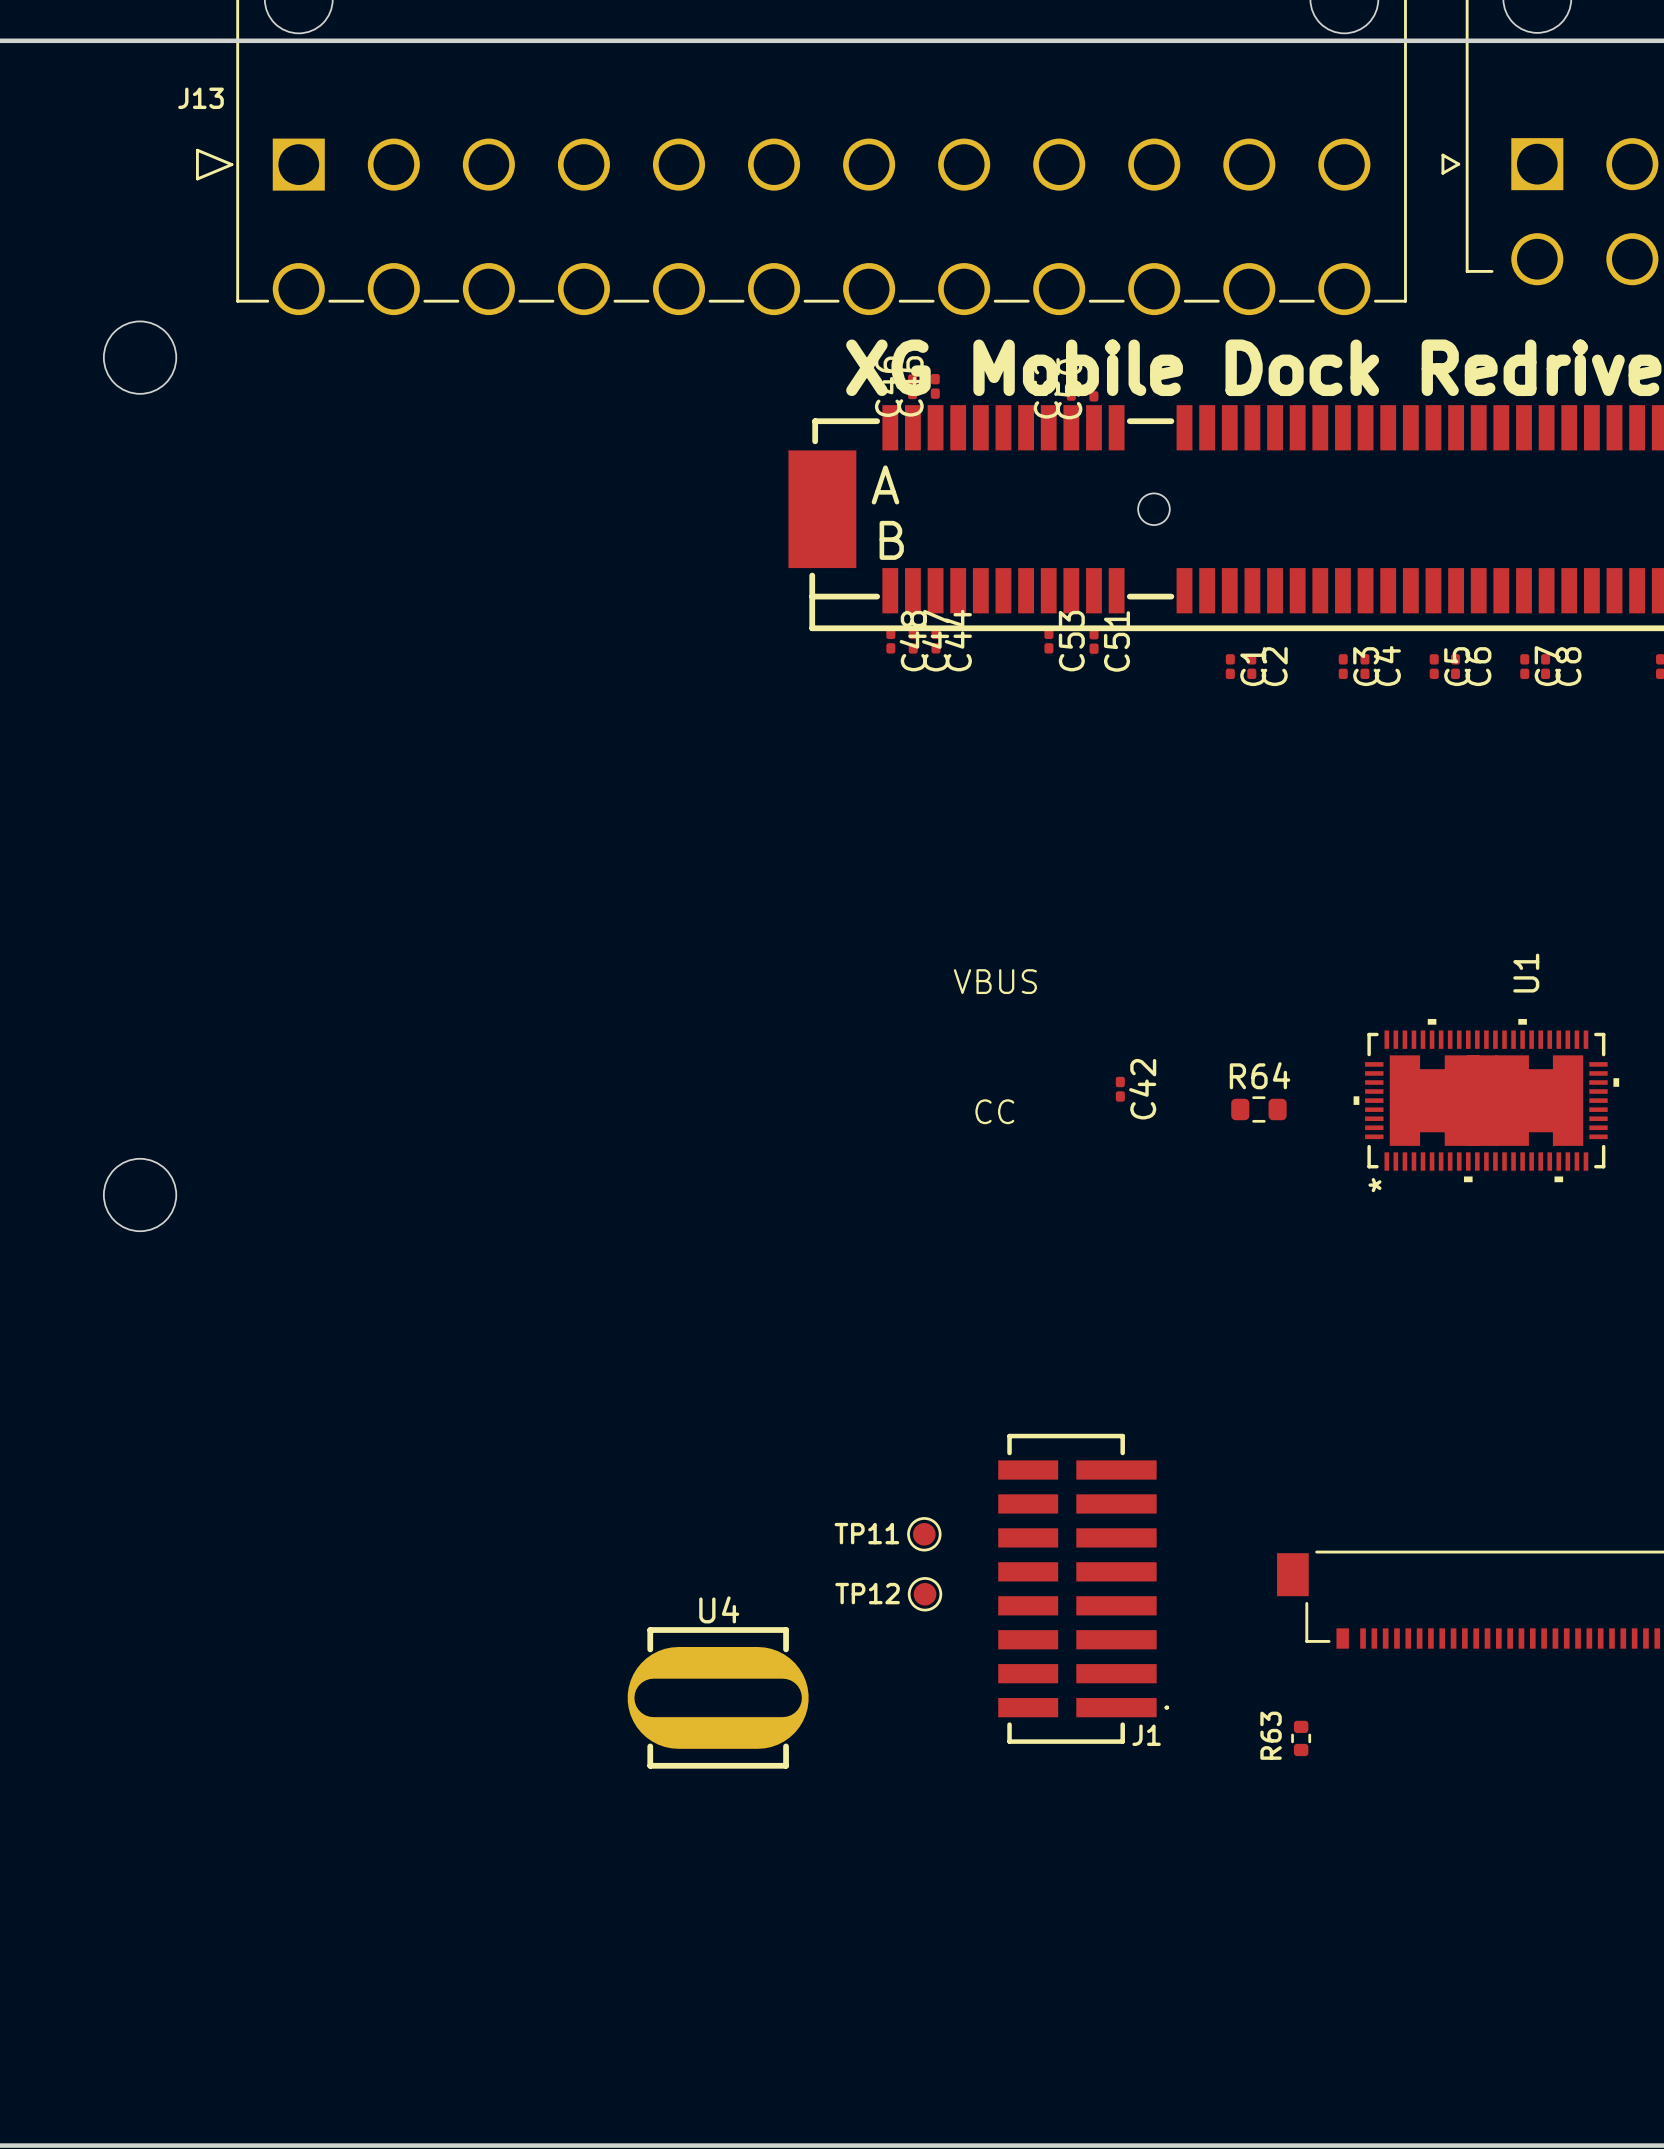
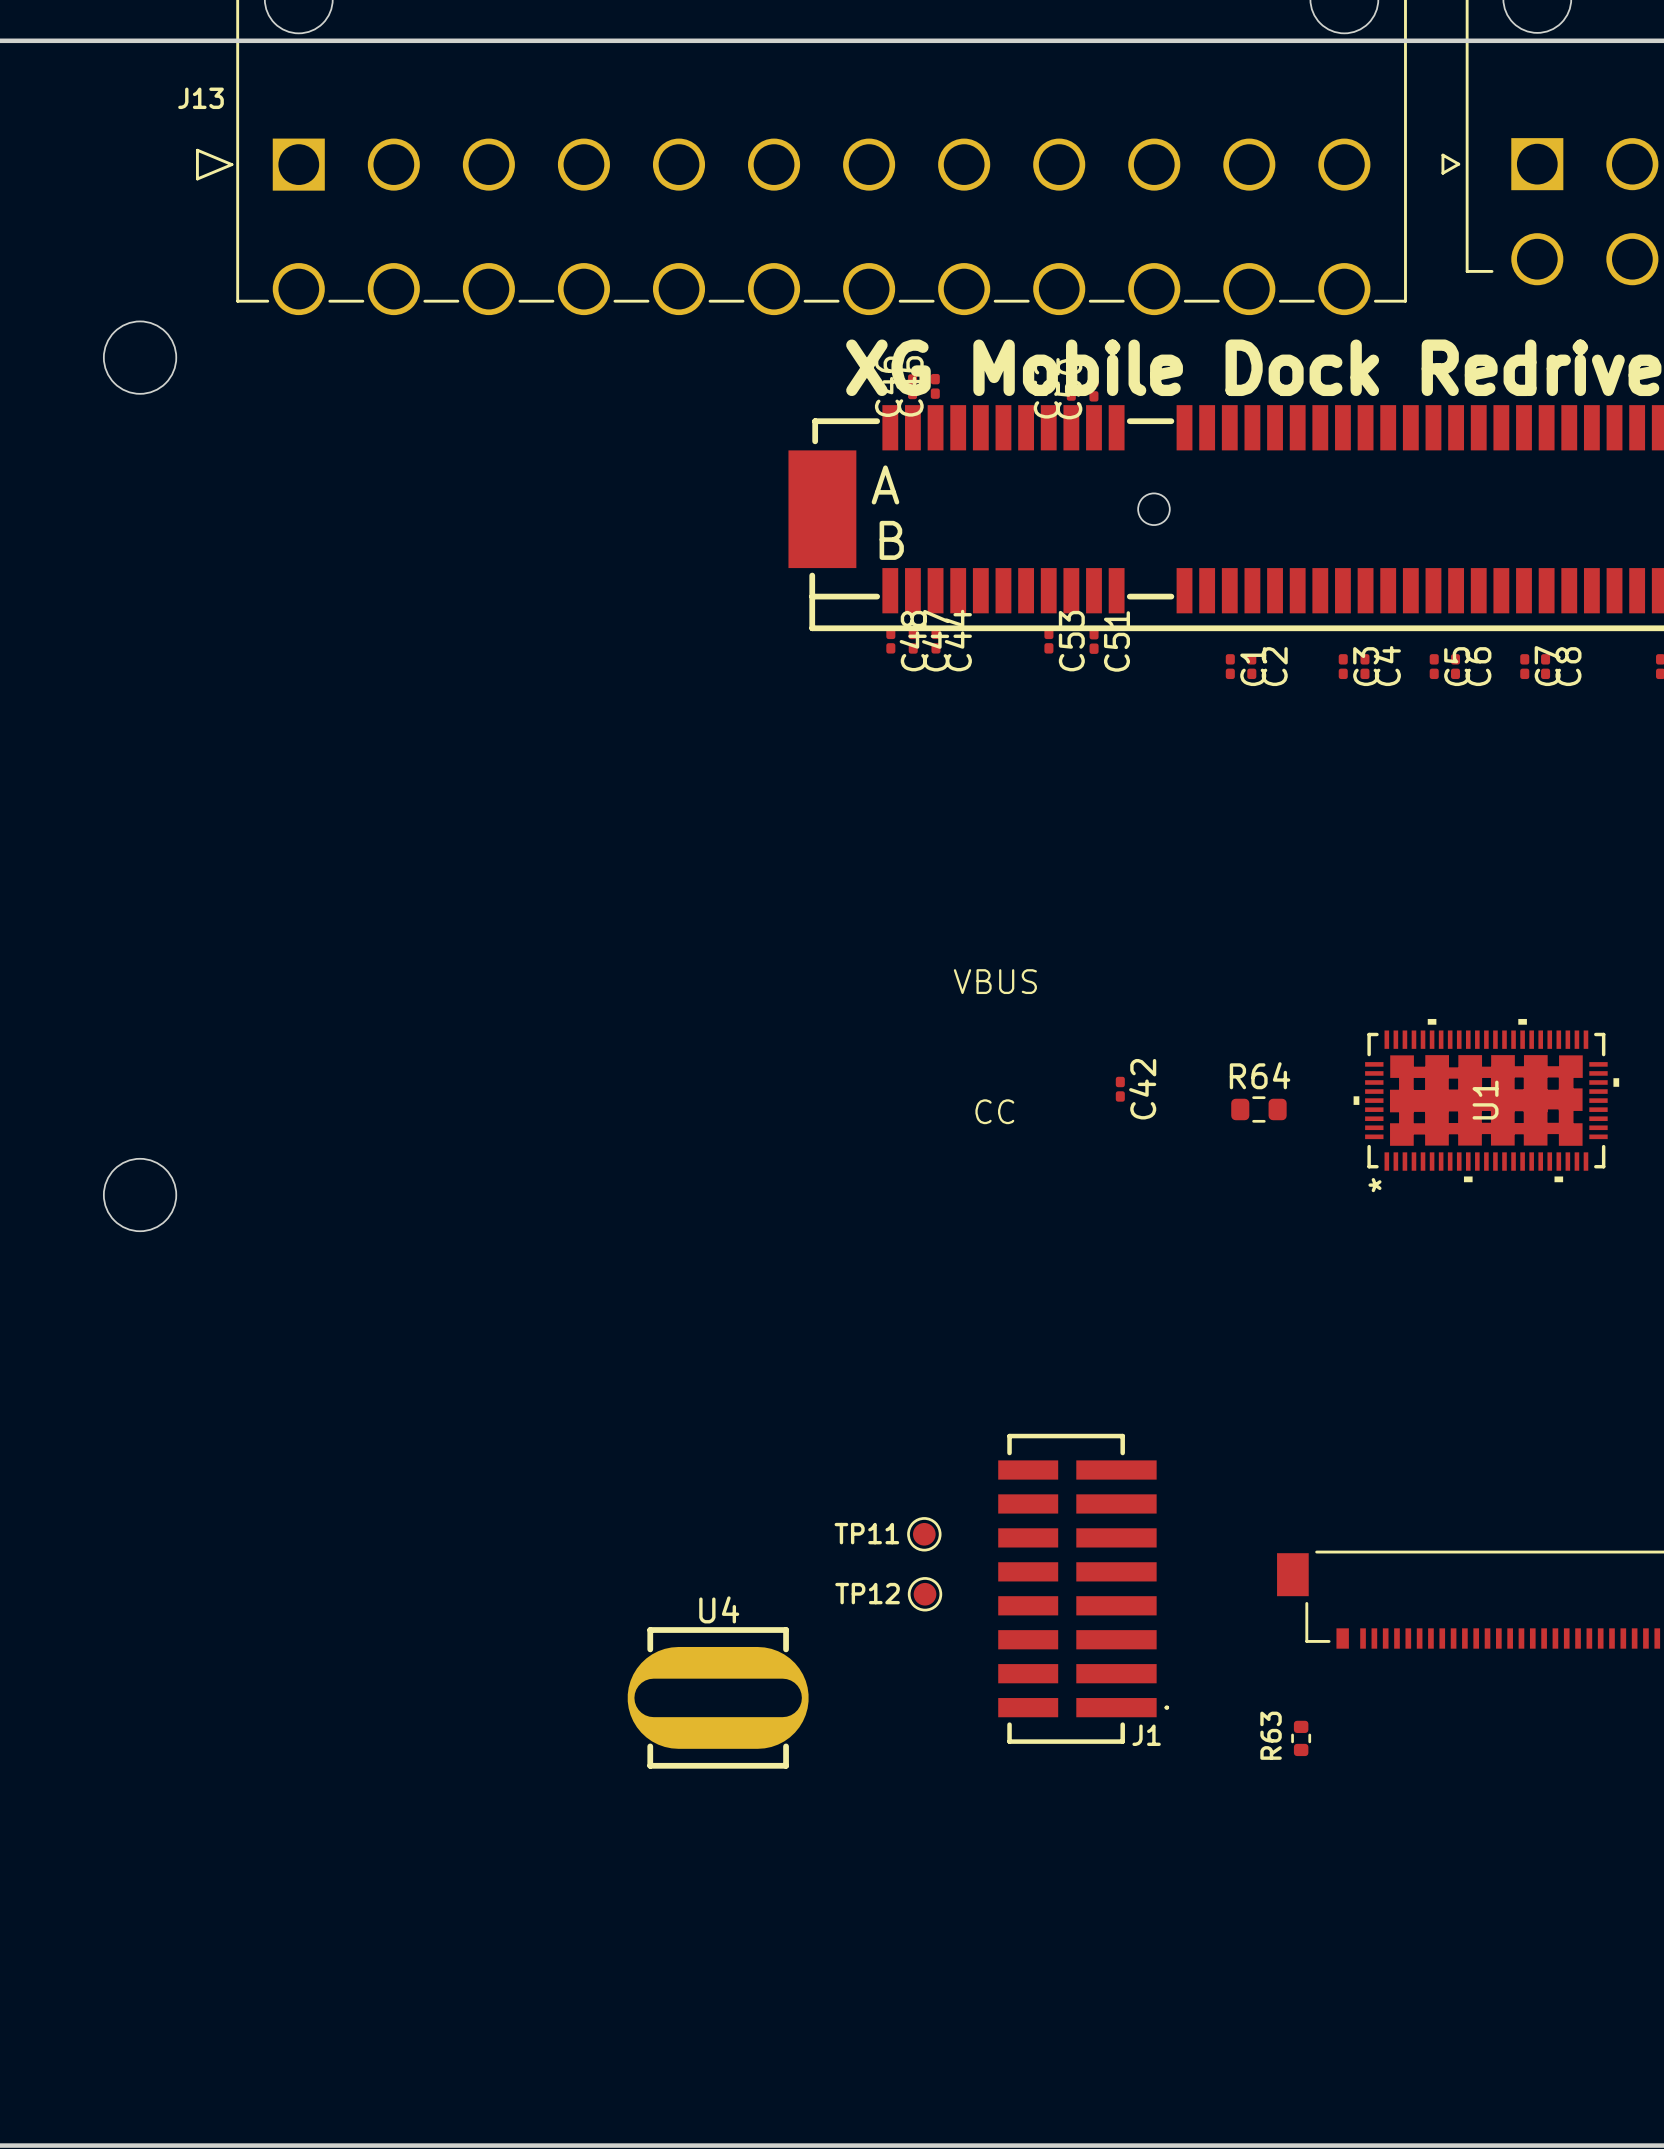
U1 name position: U1 (1526, 973) -> U1 (1485, 1100)
U1 footprint: [1353, 1018, 1620, 1183] -> [1353, 1018, 1620, 1183]

